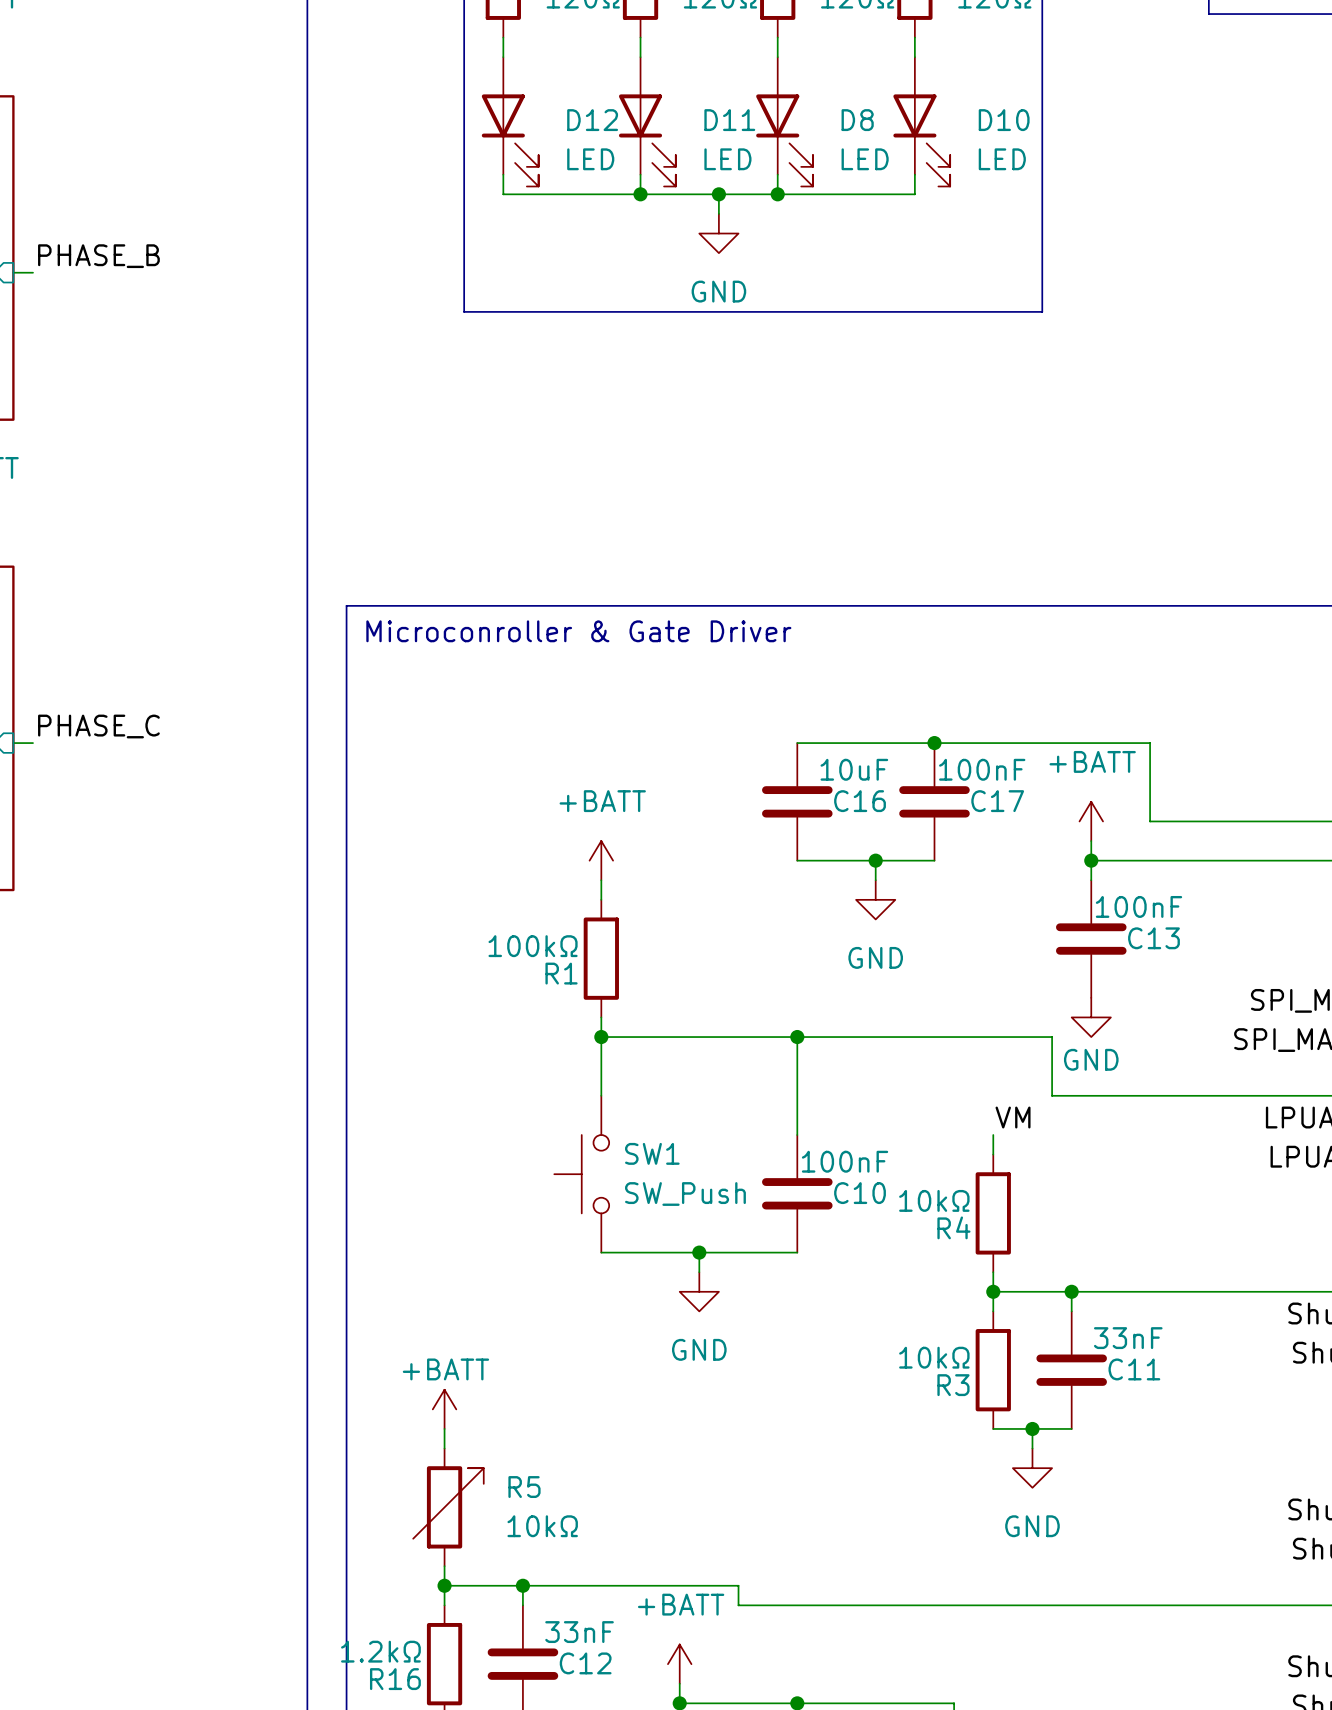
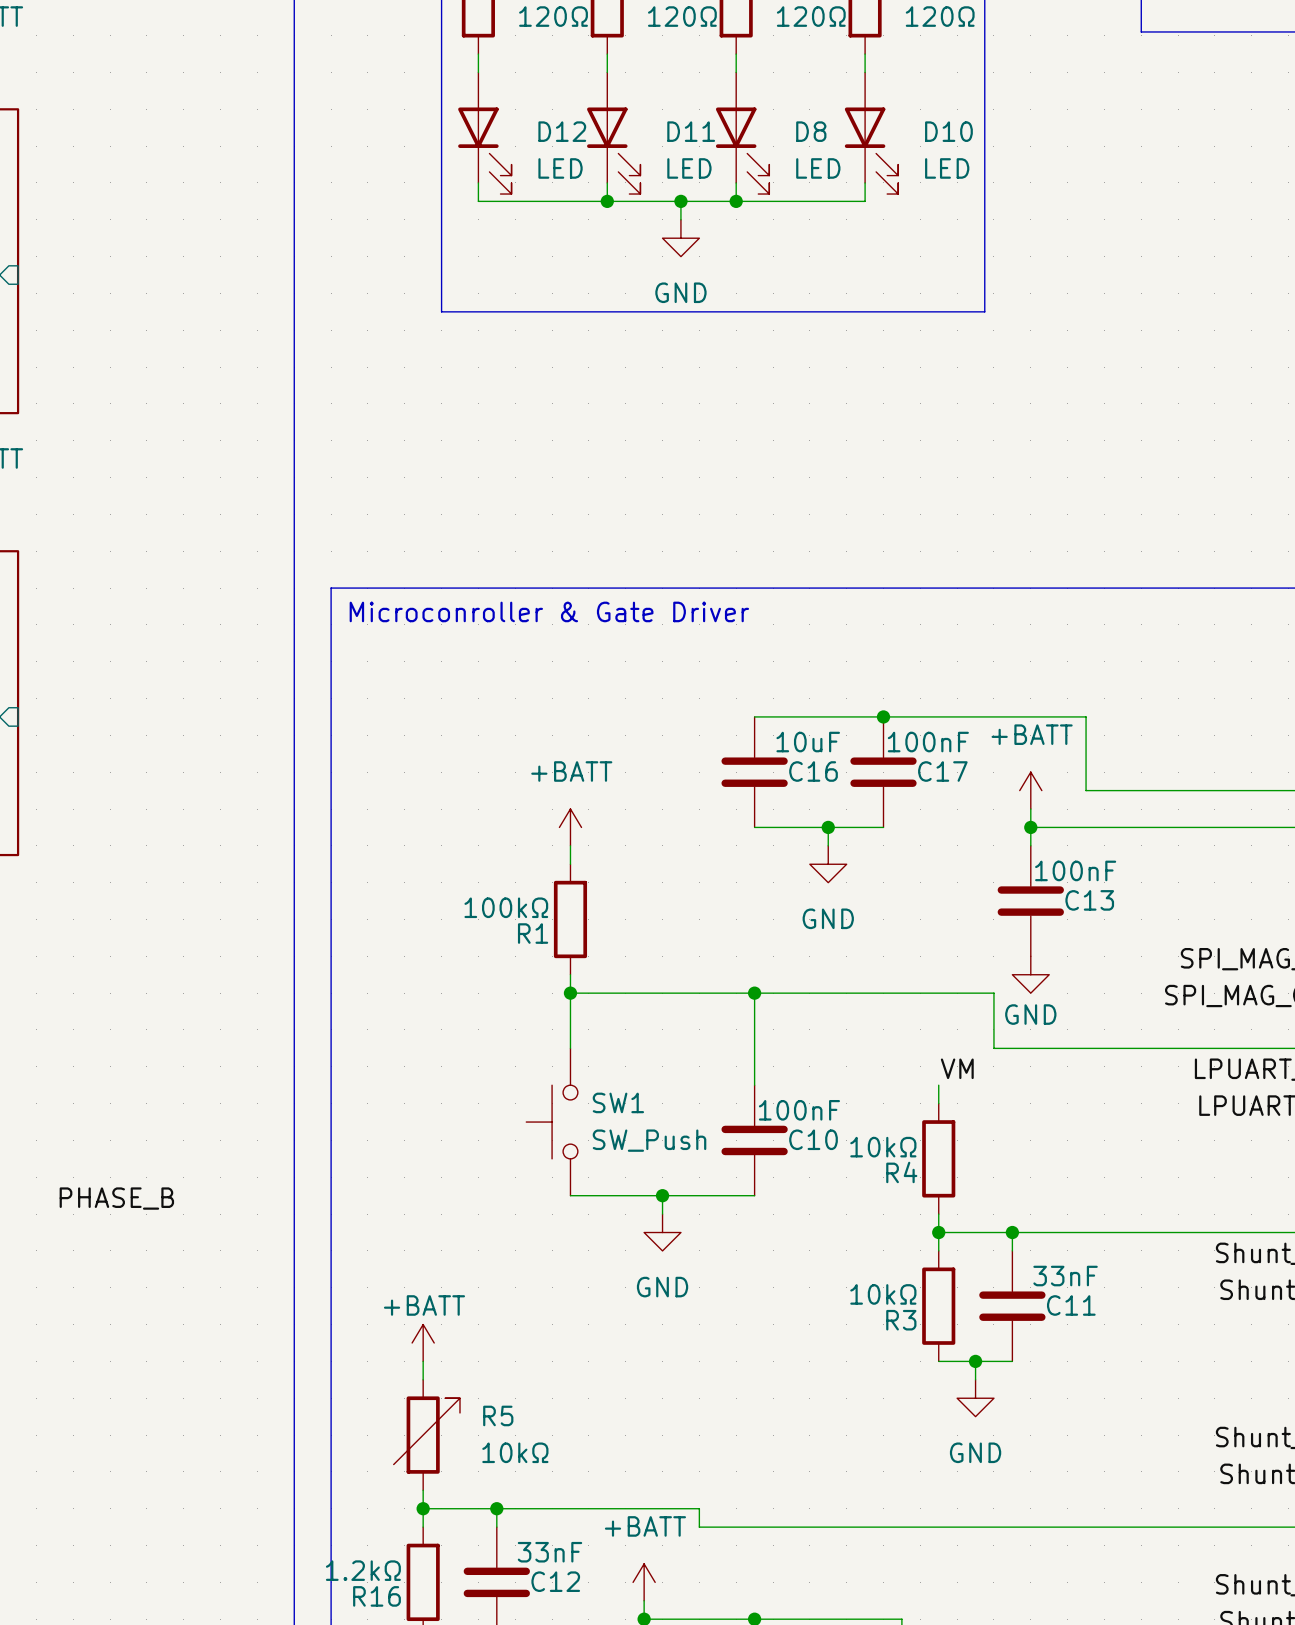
label: PHASE_B (98, 256) -> none
wire: (13, 272) (33, 272) -> none
label: PHASE_C (98, 726) -> none
wire: (13, 743) (33, 743) -> none
label: none -> PHASE_B (116, 1198)

